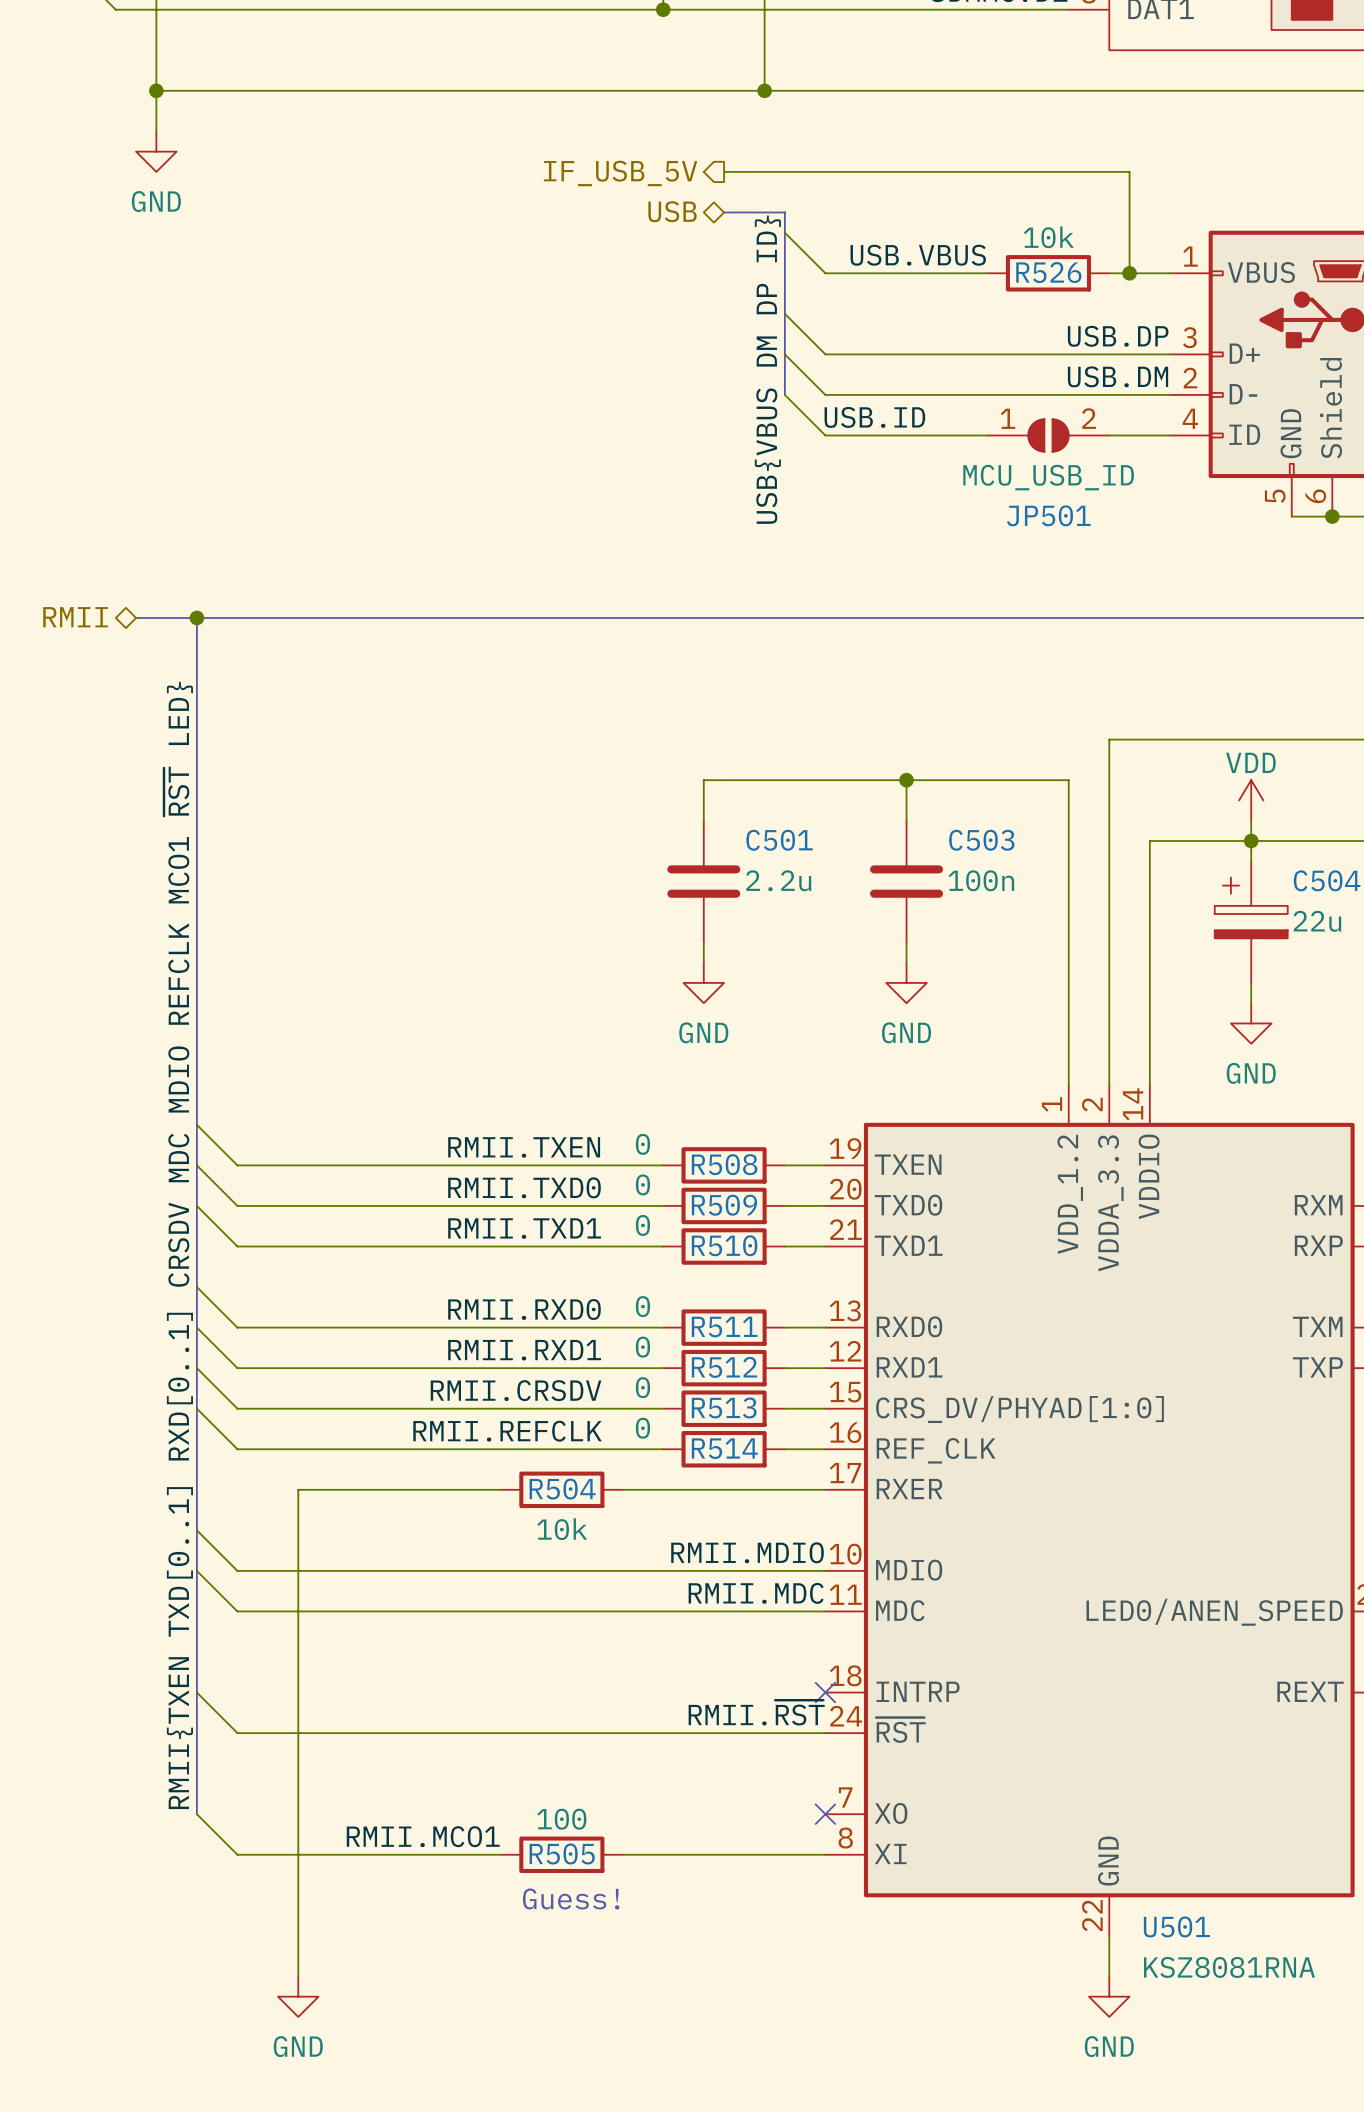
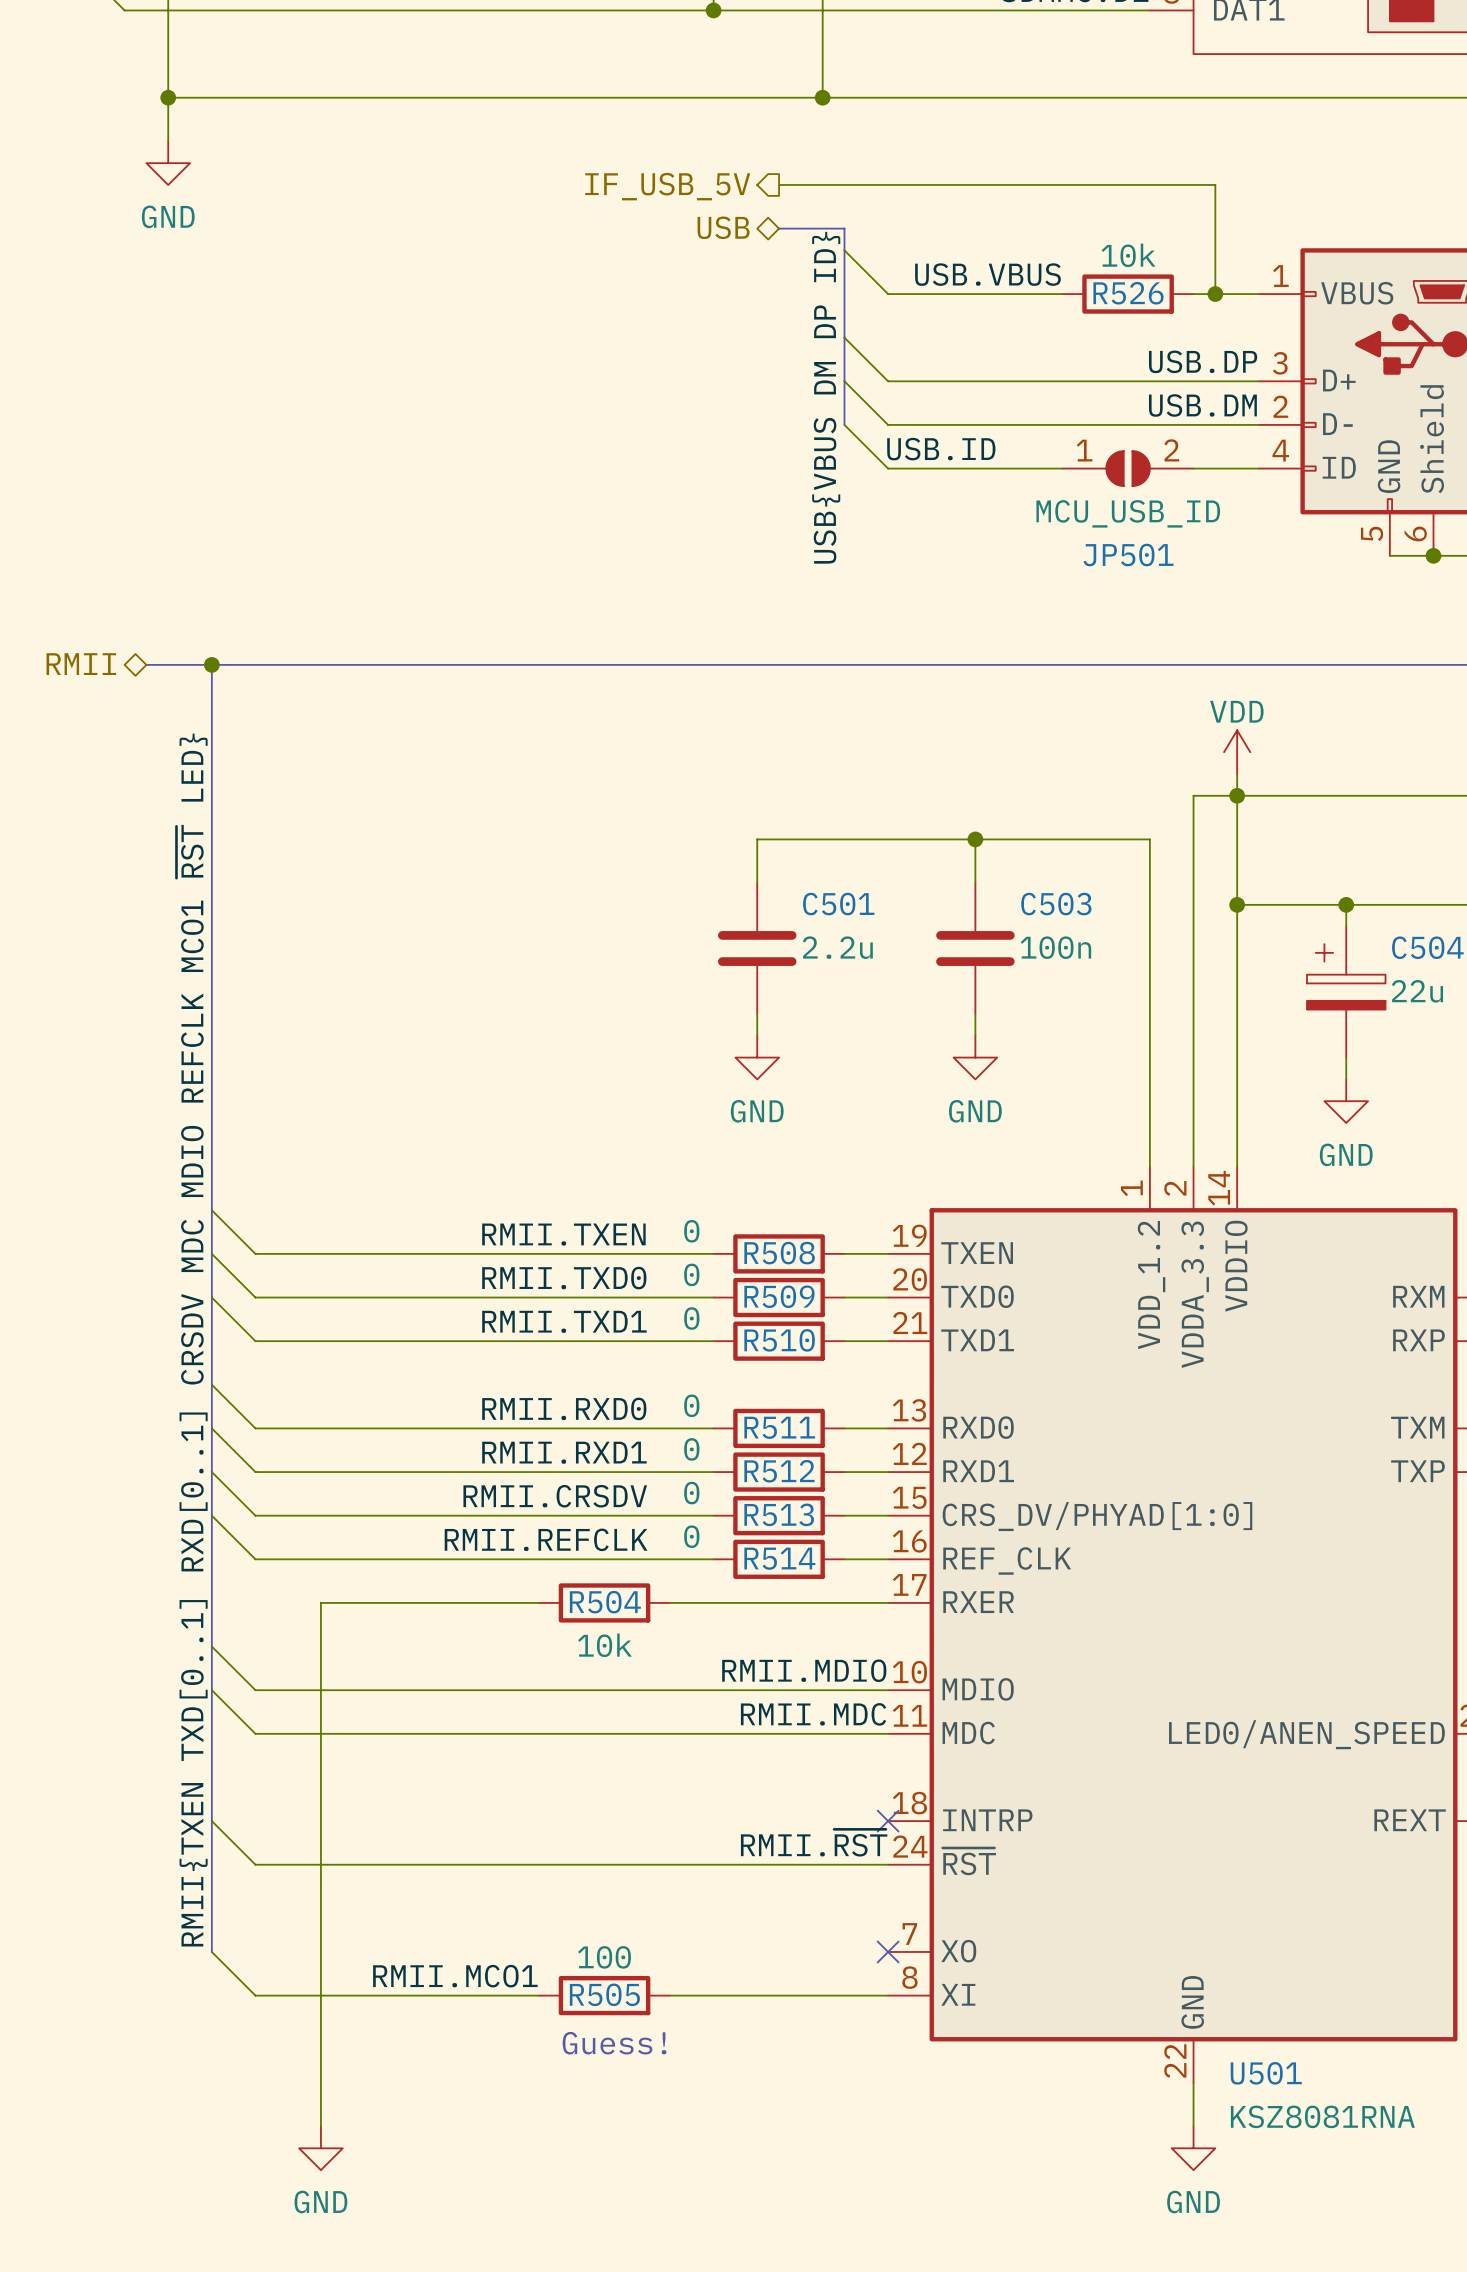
wire: none -> (1237, 773) (1237, 904)
junction: none -> (1237, 795)
power symbol position: VDD (1251, 800) -> VDD (1237, 752)
wire: (1251, 820) (1251, 841) -> none
junction: none -> (1237, 904)

